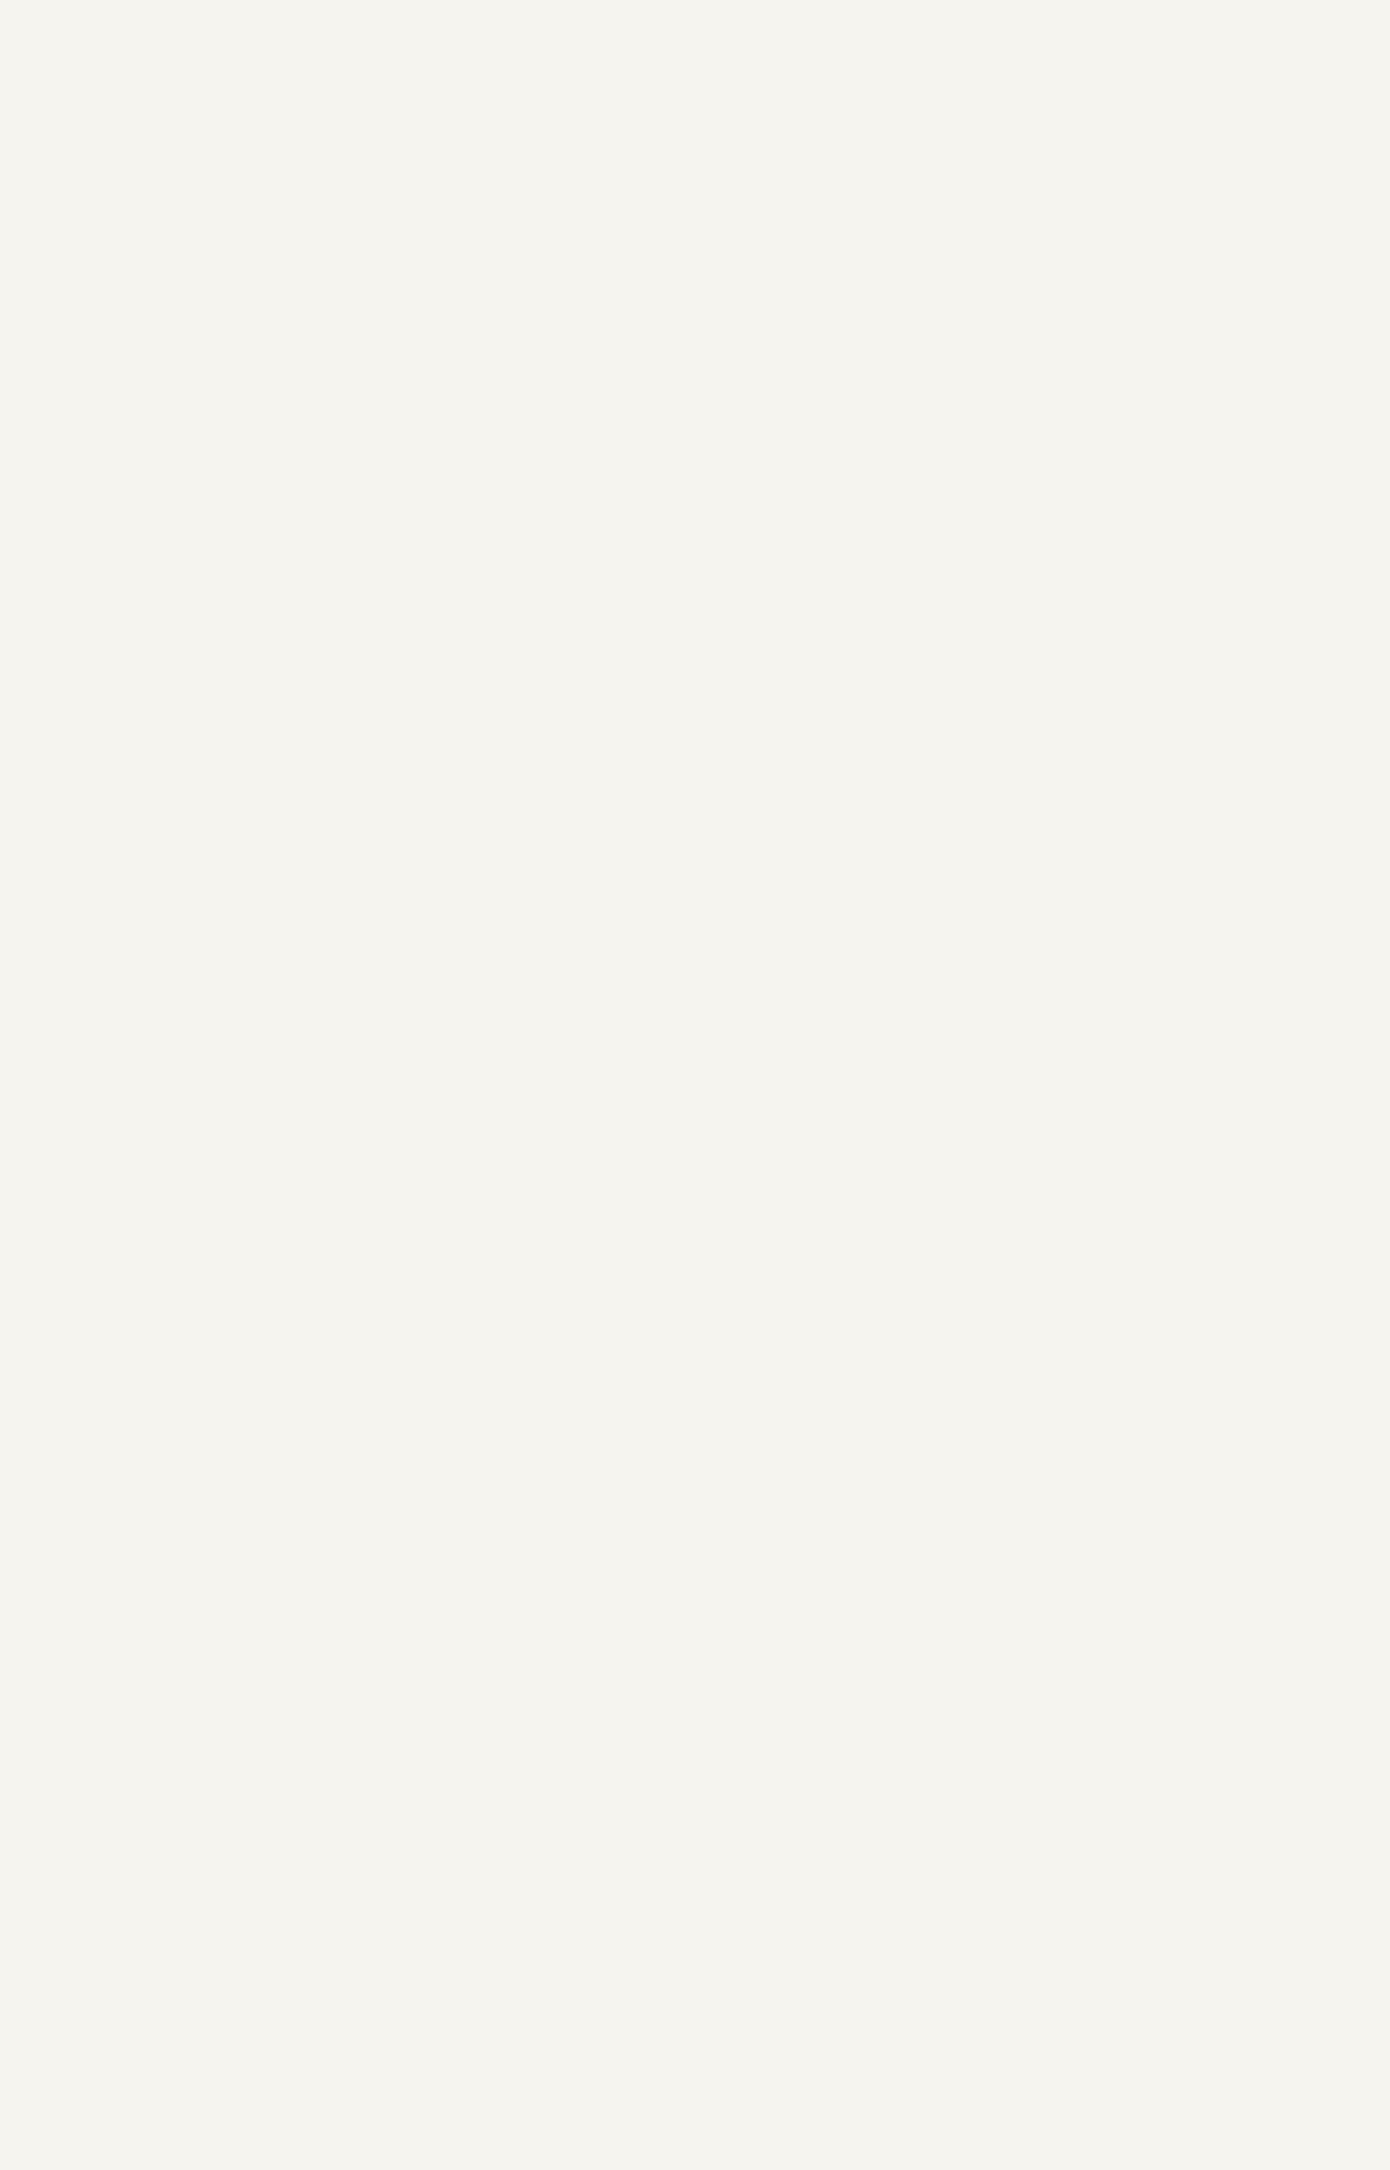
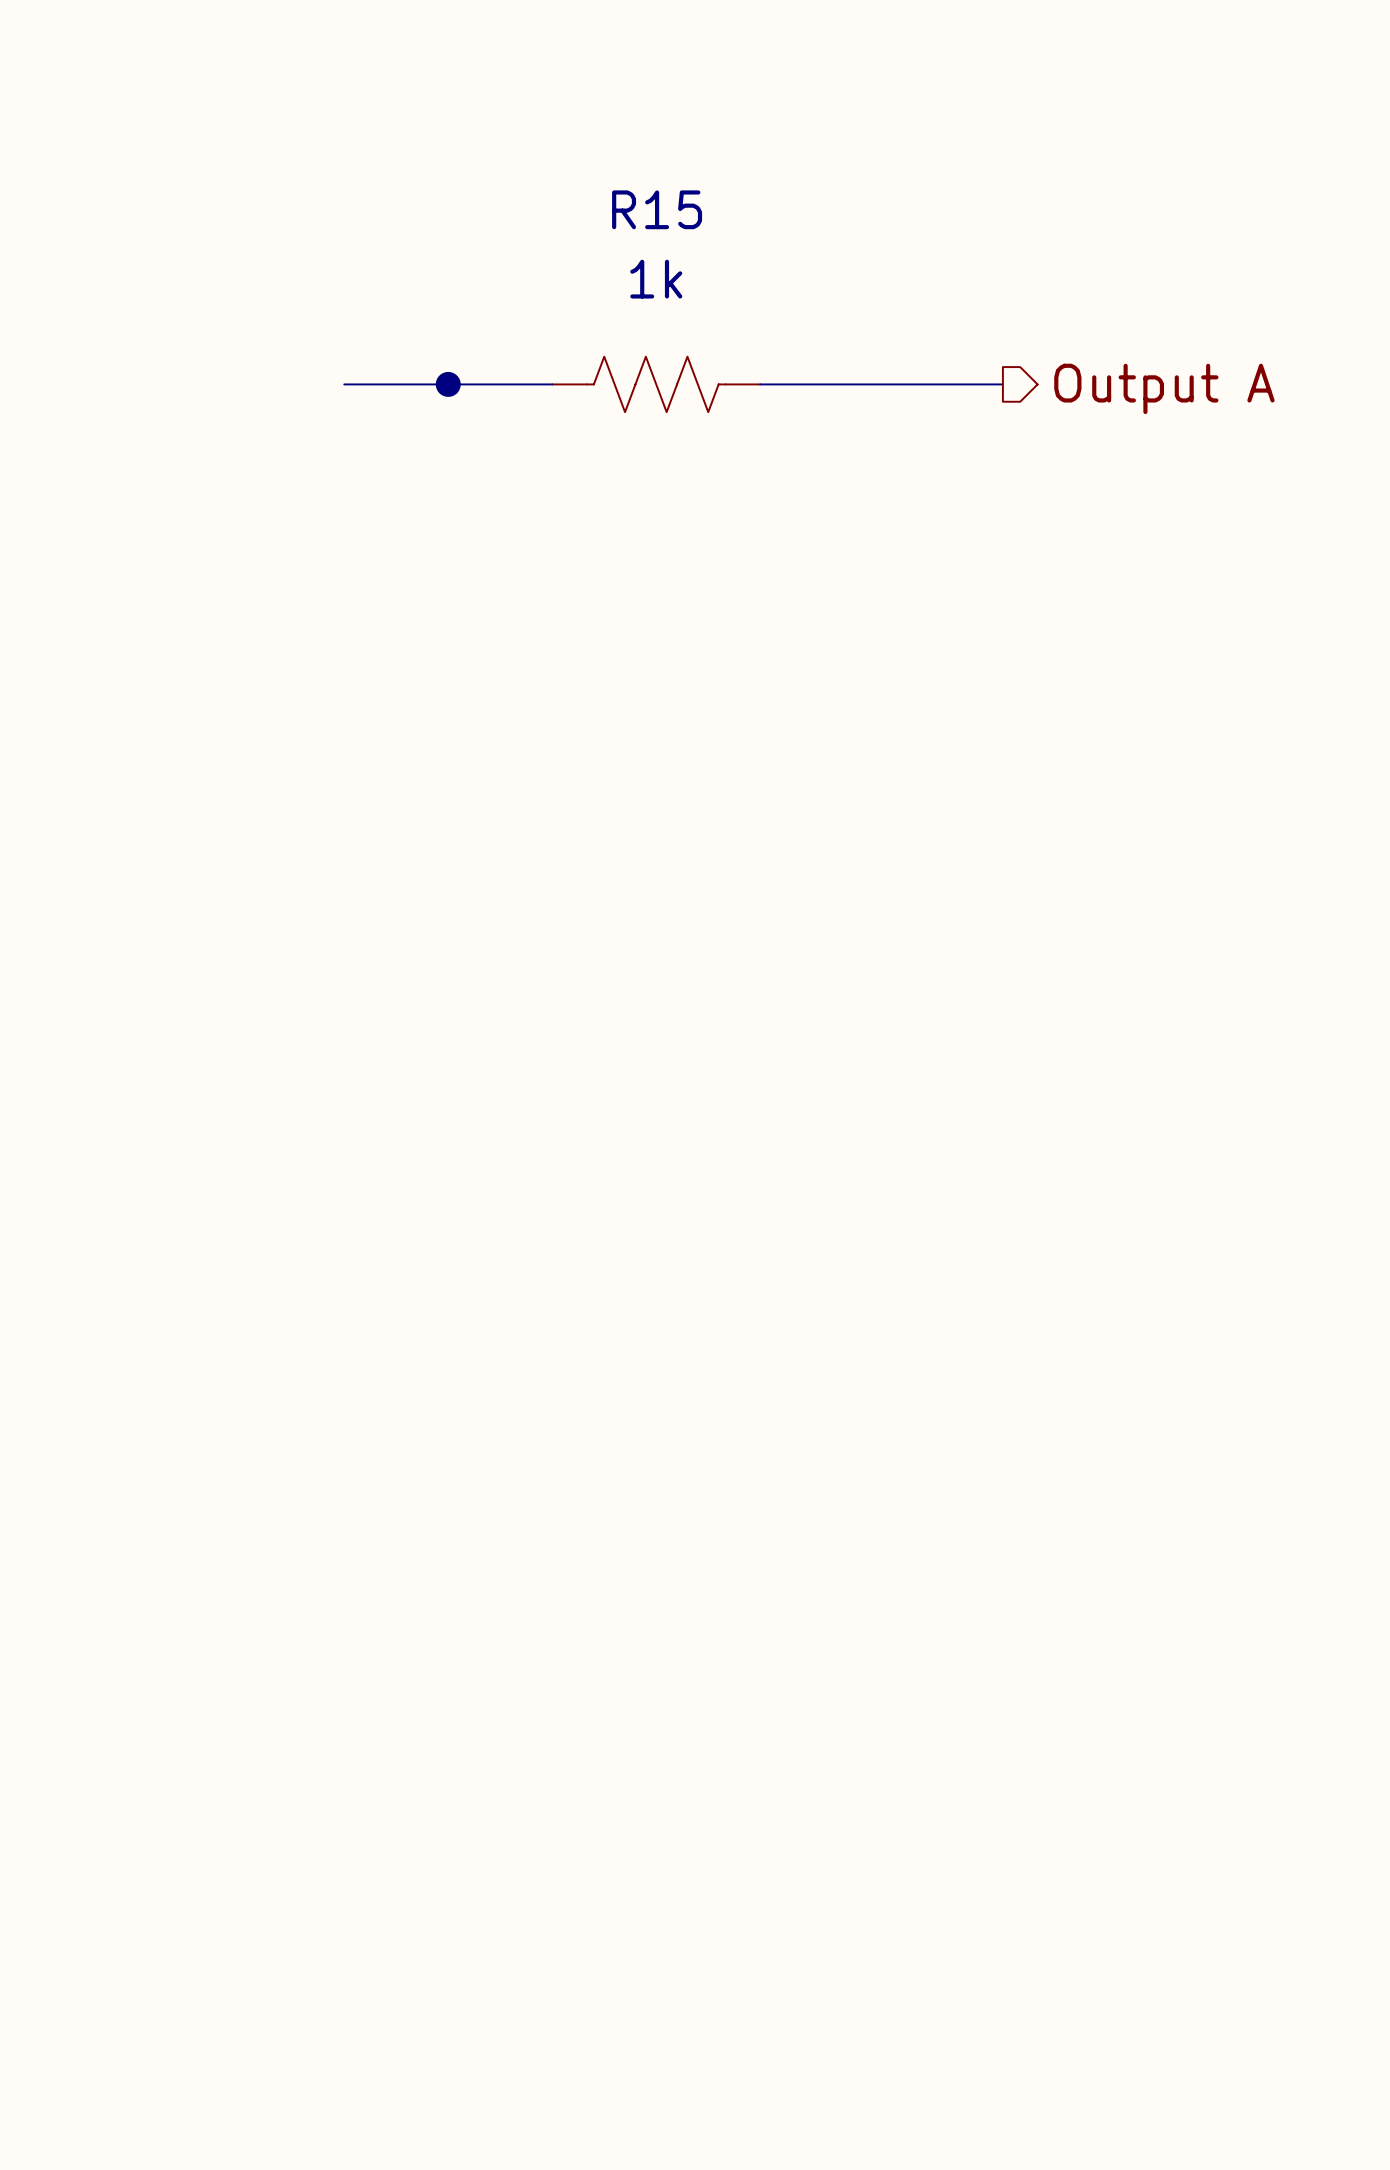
wire: none -> (344, 384) (552, 384)
junction: none -> (448, 384)
R15: none -> 1k (656, 384)
wire: none -> (760, 384) (1002, 384)
hierarchical label: none -> Output A (1164, 388)

